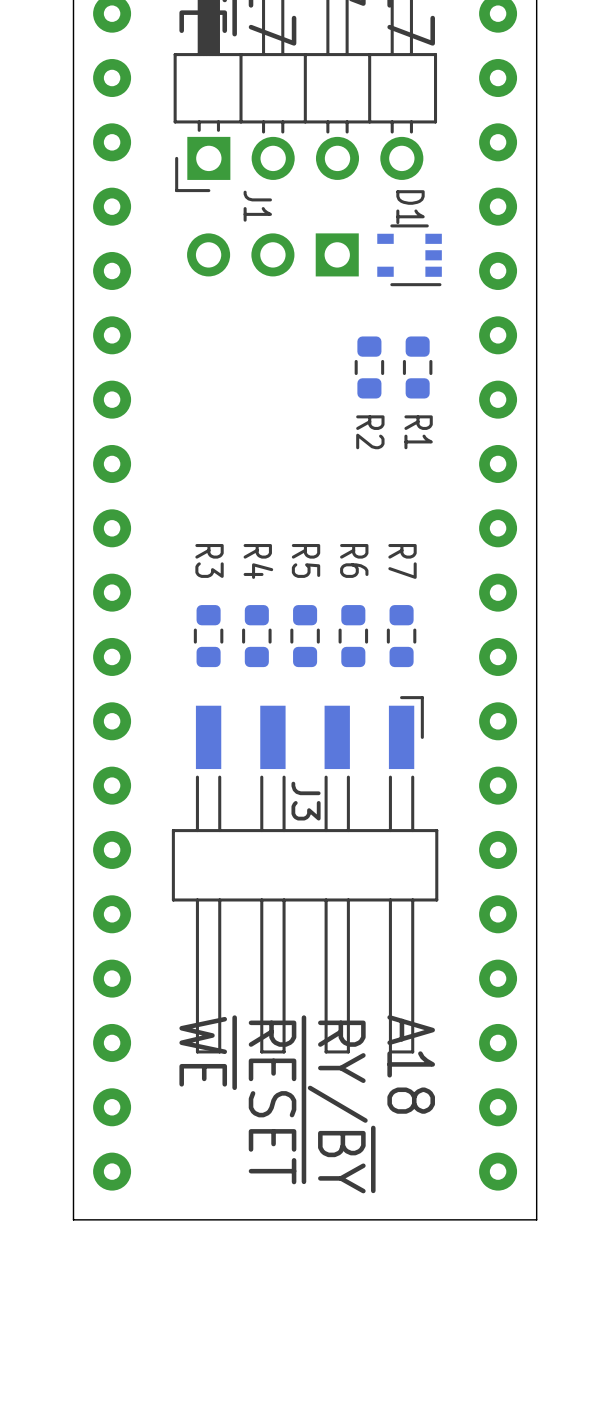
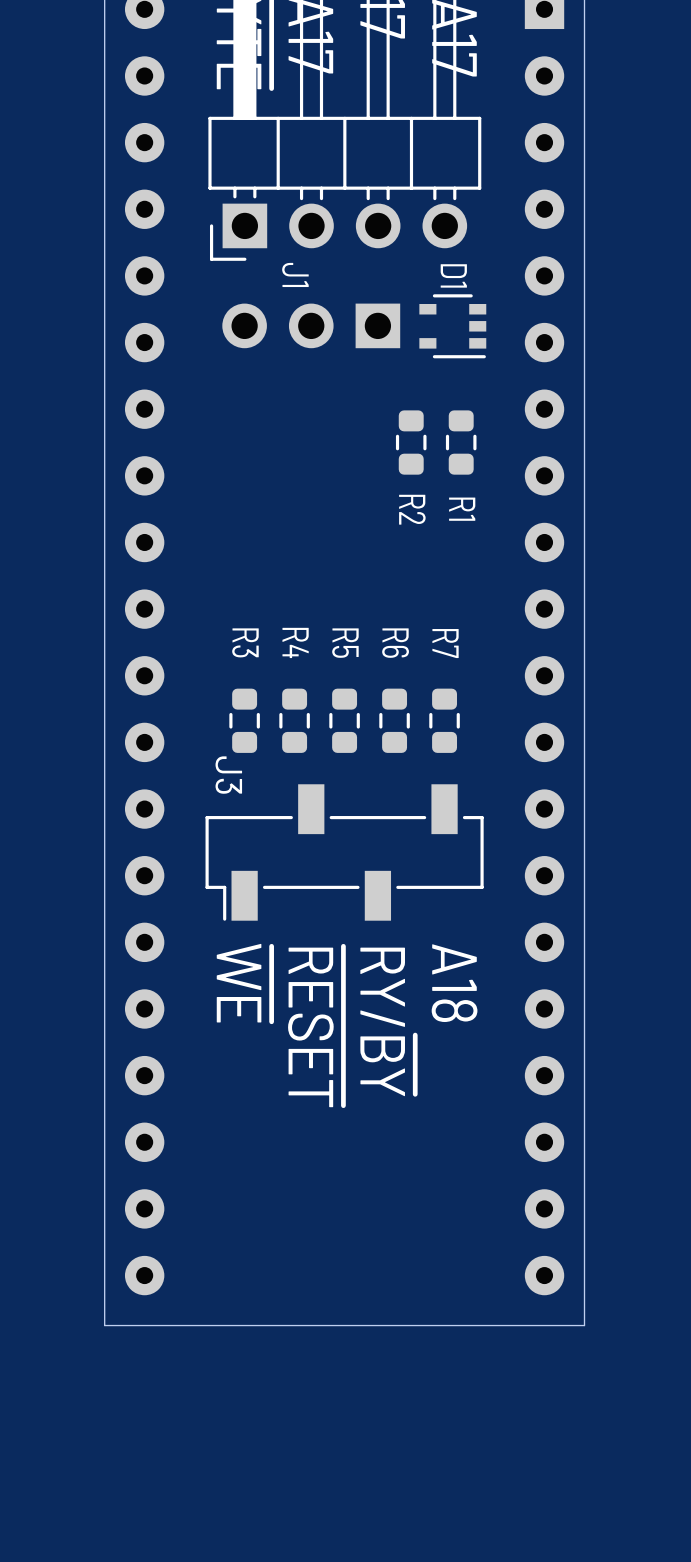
J3 footprint: [171, 696, 439, 1054] -> [205, 784, 484, 921]
J3 name position: J3 (306, 801) -> J3 (228, 775)
text position: ~{WE} (208, 1052) -> ~{WE} (244, 983)
text position: A18 (411, 1064) -> A18 (454, 983)
text position: ~{RESET} (277, 1099) -> ~{RESET} (315, 1026)
text position: RY/~{BY} (341, 1106) -> RY/~{BY} (387, 1021)

